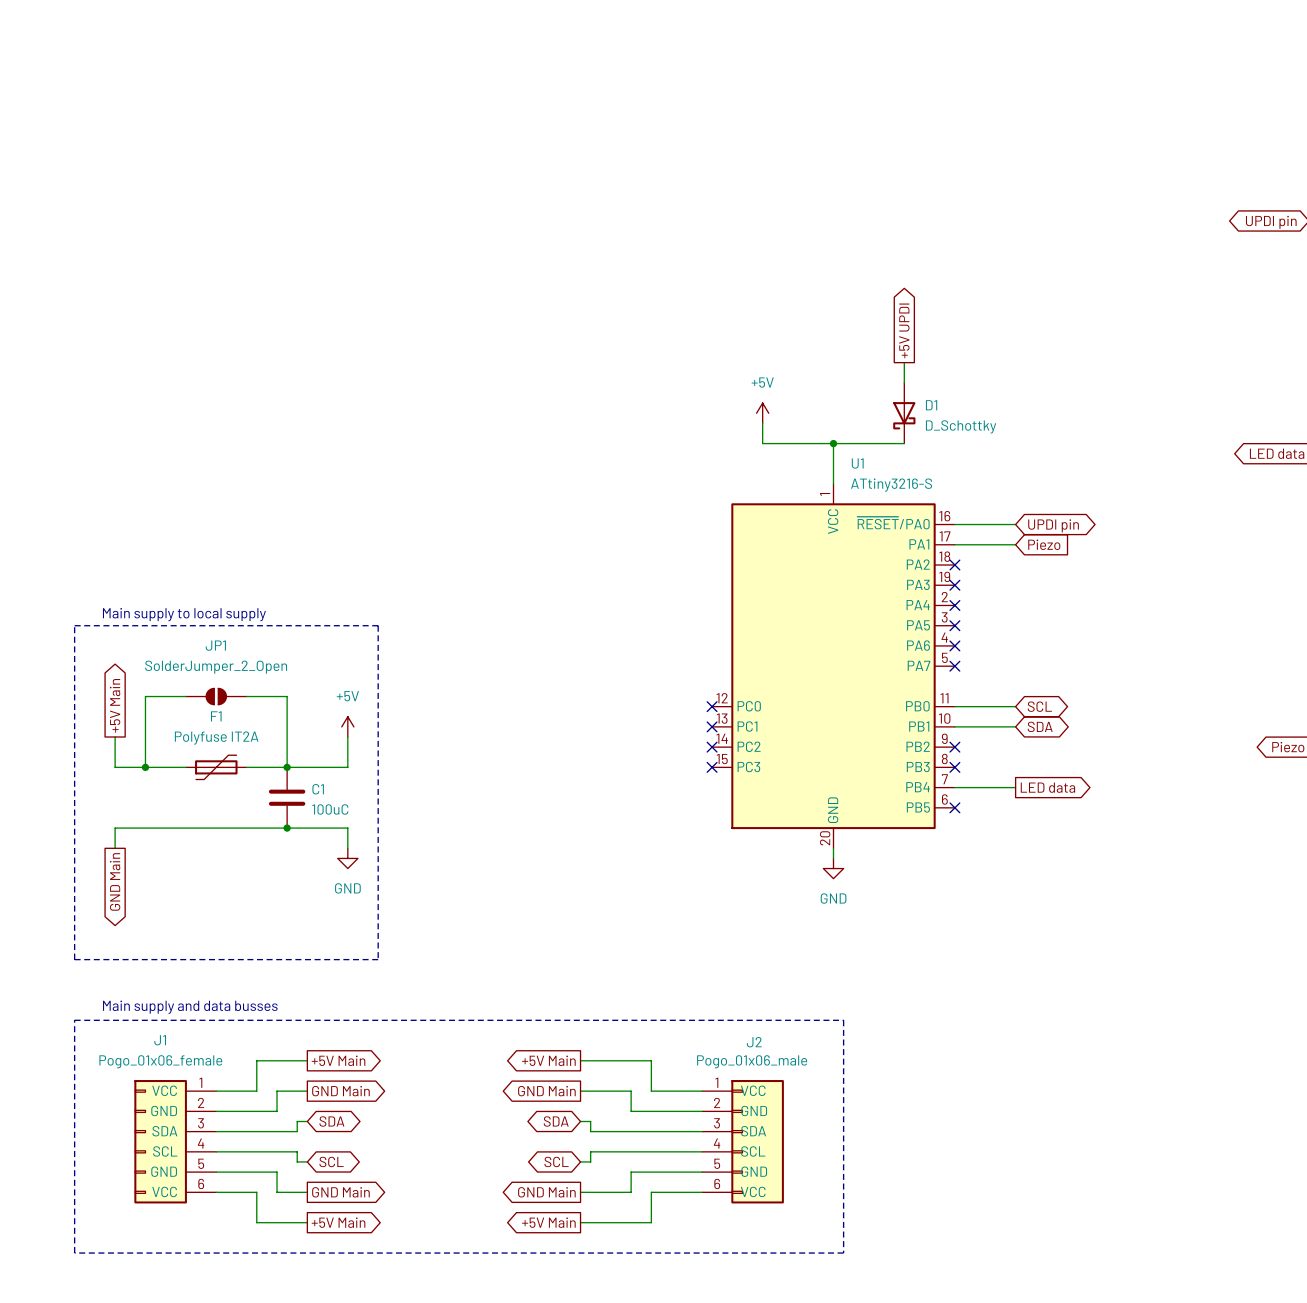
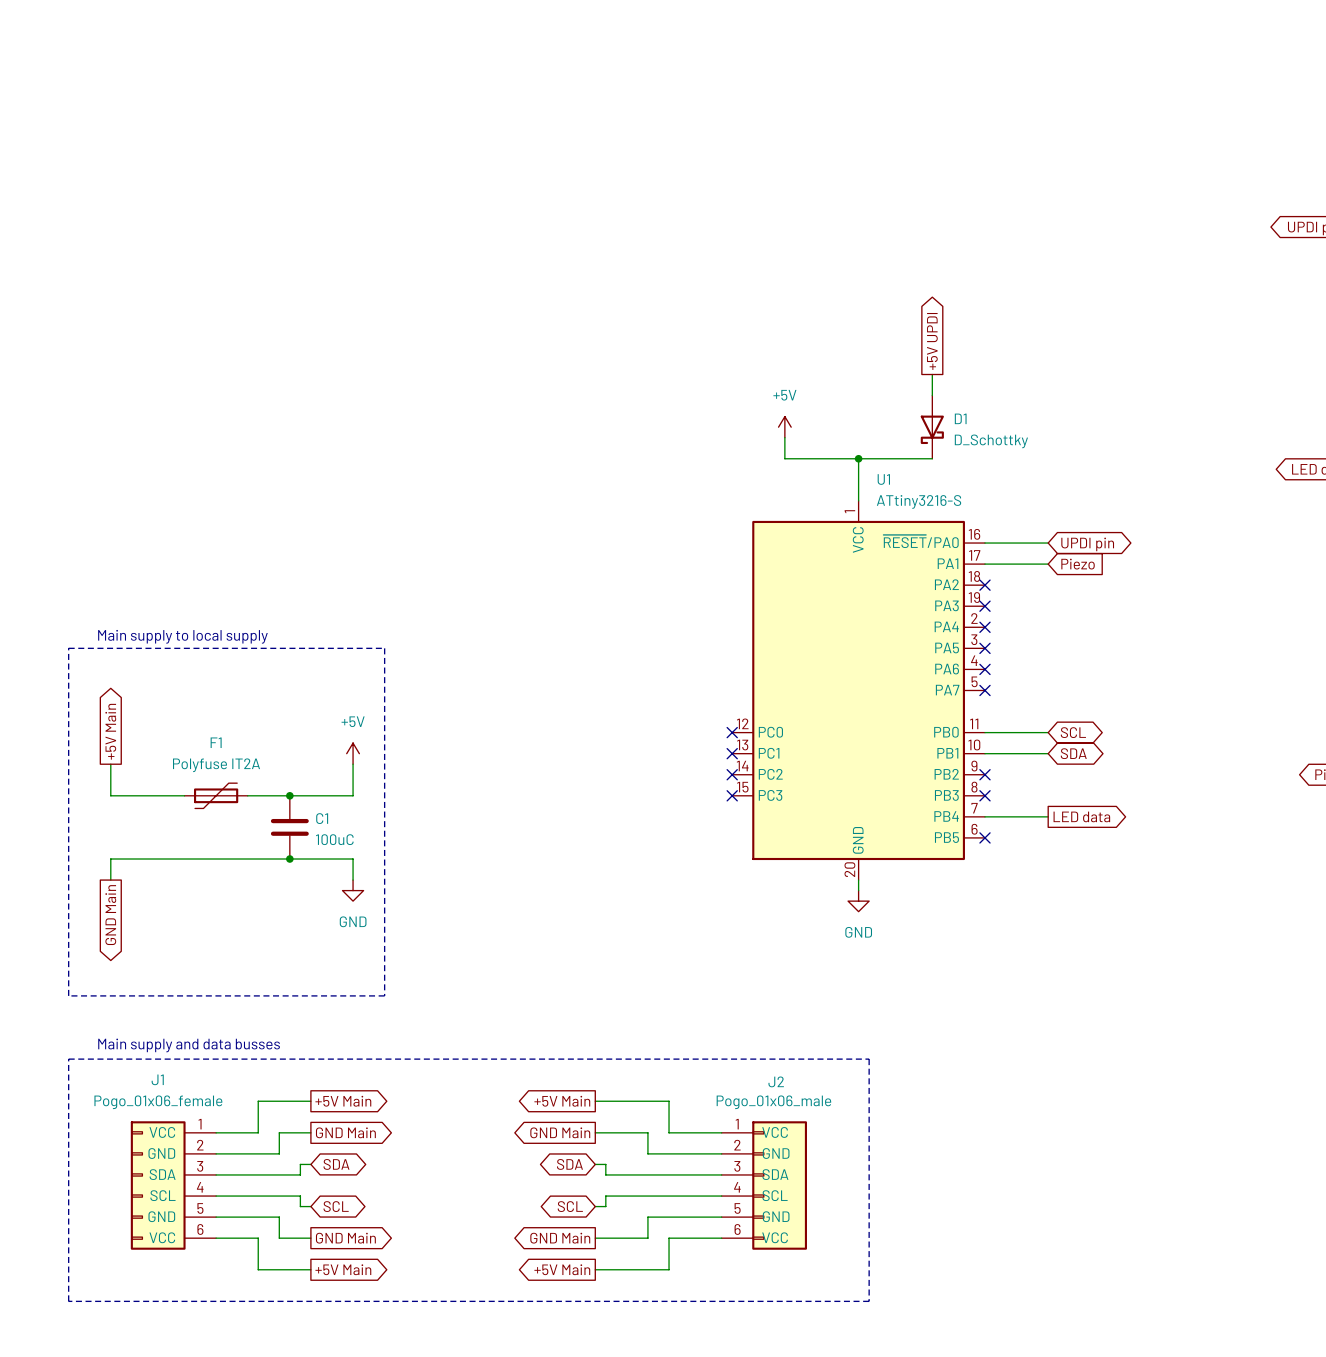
wire: (185, 696) (145, 696) (145, 767) -> none
JP1: SolderJumper_2_Open (216, 696) -> none
wire: (246, 696) (287, 696) (287, 767) -> none
junction: (145, 767) -> none

